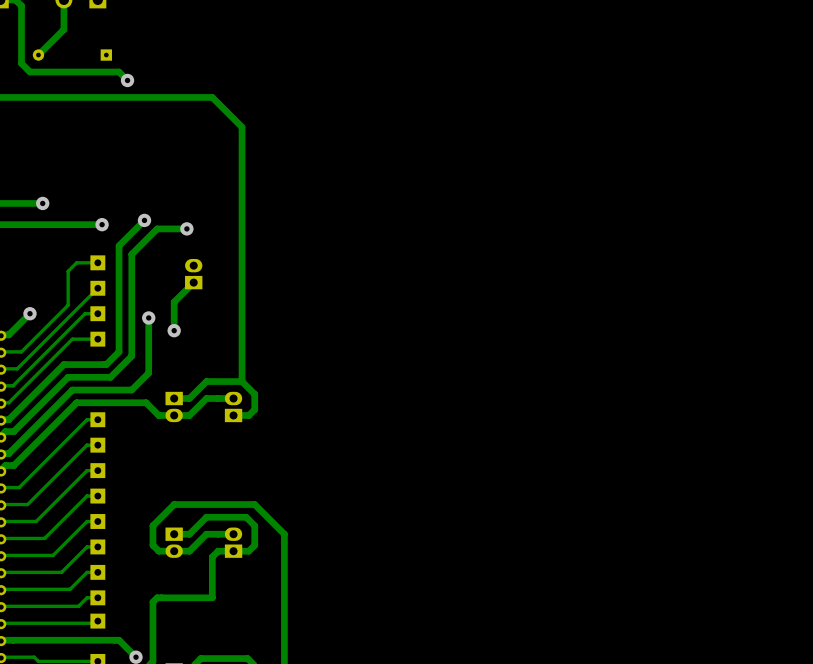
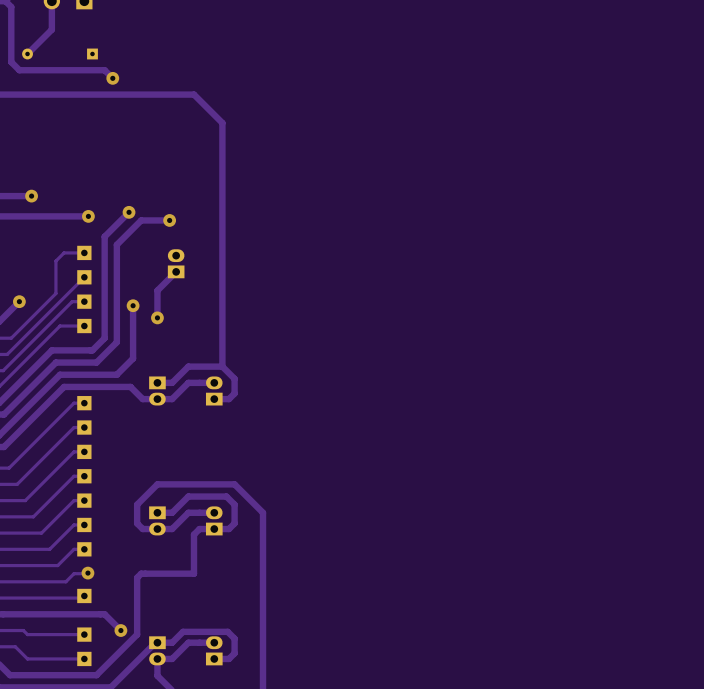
part: (97, 597) -> none
via: none -> (87, 573)

